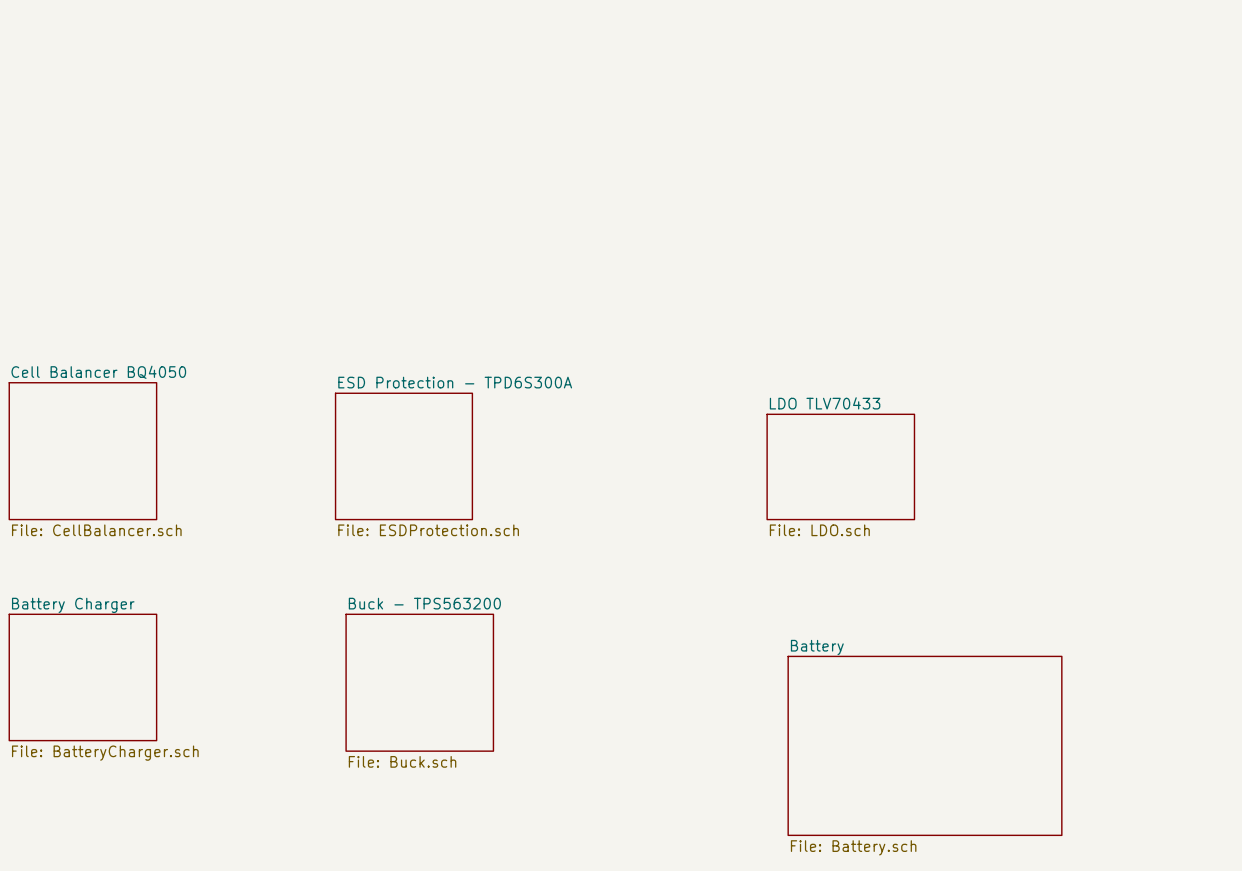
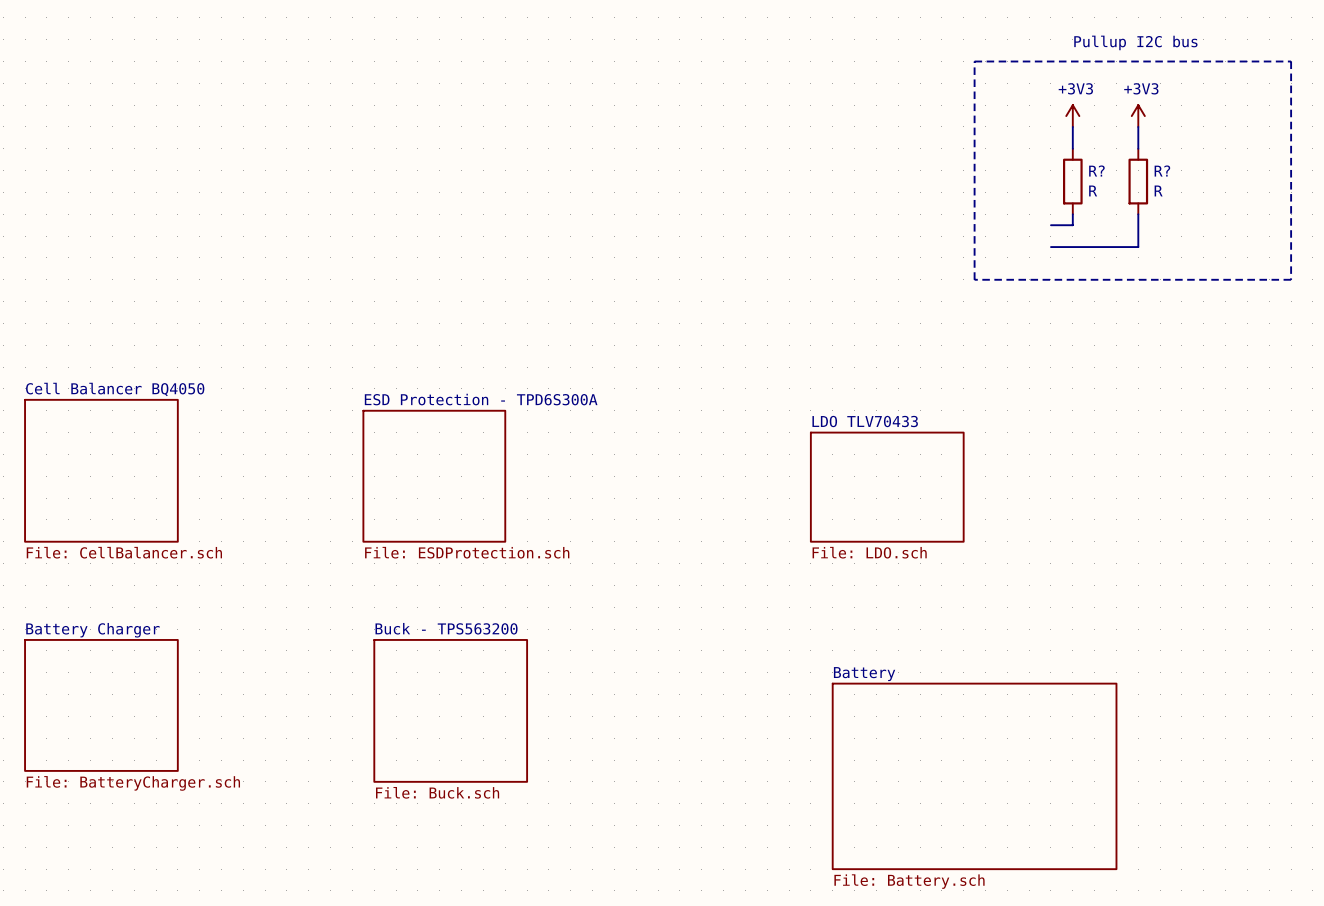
text: none -> Pullup I2C bus (1135, 42)
line: none -> (974, 61) (1291, 61) (1291, 279) (974, 279) (974, 61)
power symbol: none -> +3V3 (1072, 116)
power symbol: none -> +3V3 (1138, 116)
wire: none -> (1072, 126) (1072, 148)
wire: none -> (1138, 126) (1138, 148)
R?: none -> R (1072, 181)
R?: none -> R (1138, 181)
wire: none -> (1072, 214) (1072, 225) (1050, 225)
wire: none -> (1138, 214) (1138, 247) (1050, 247)

